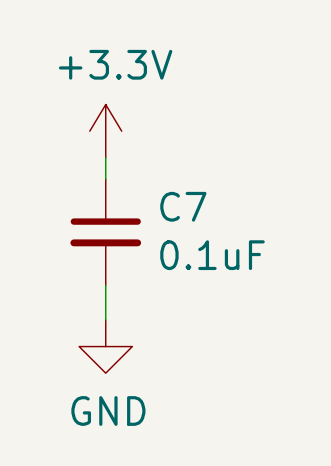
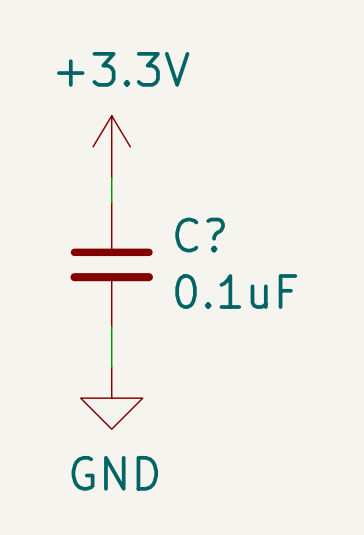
C7 name: C7 (183, 206) -> C? (200, 235)

